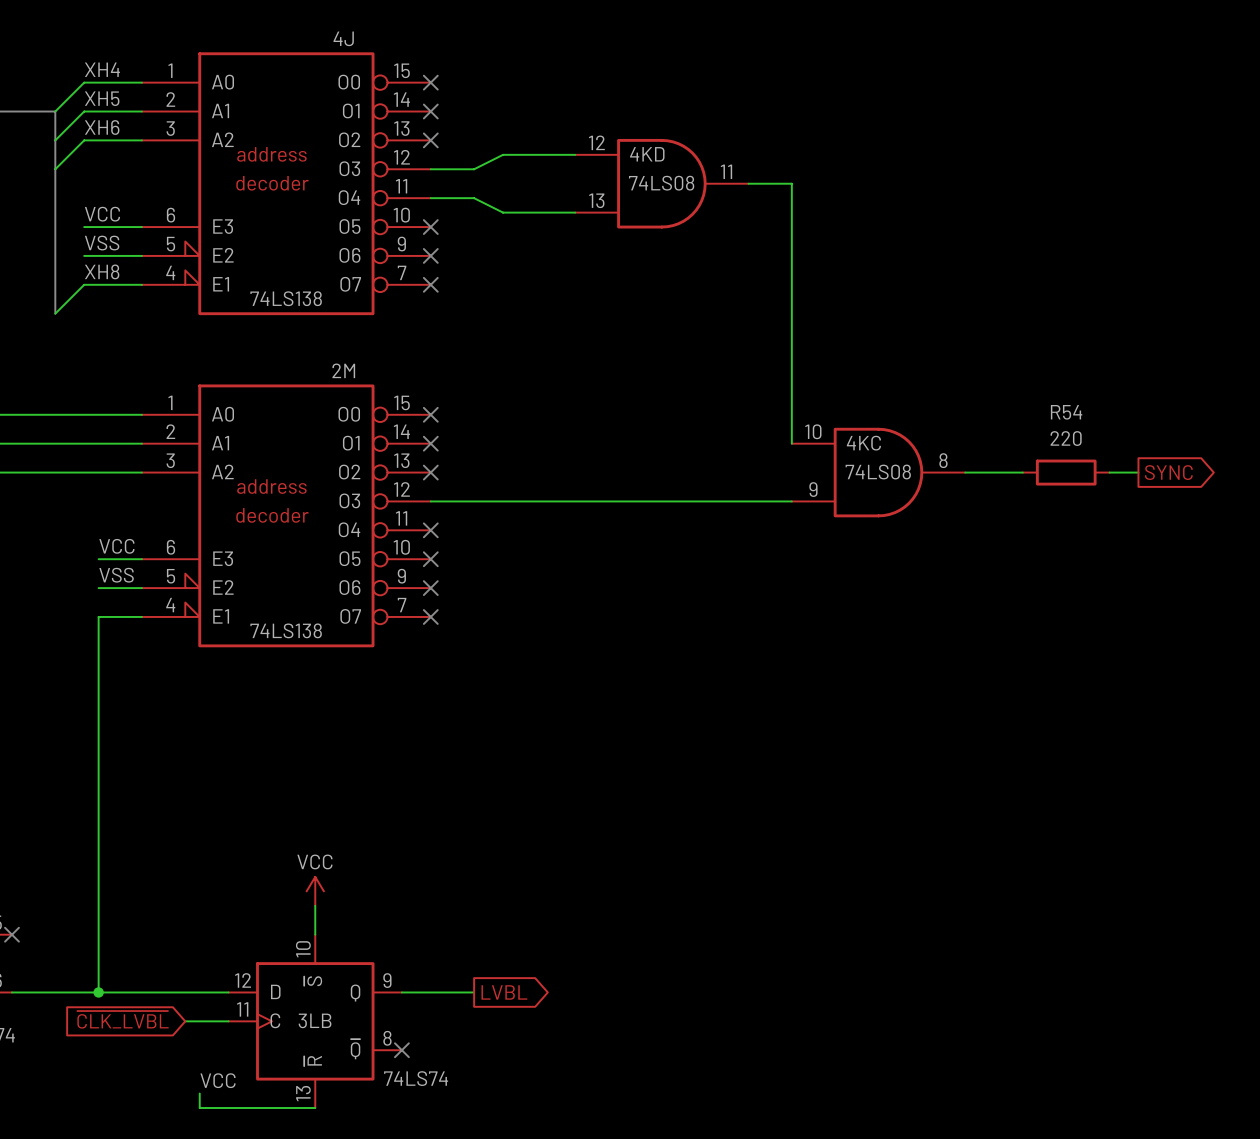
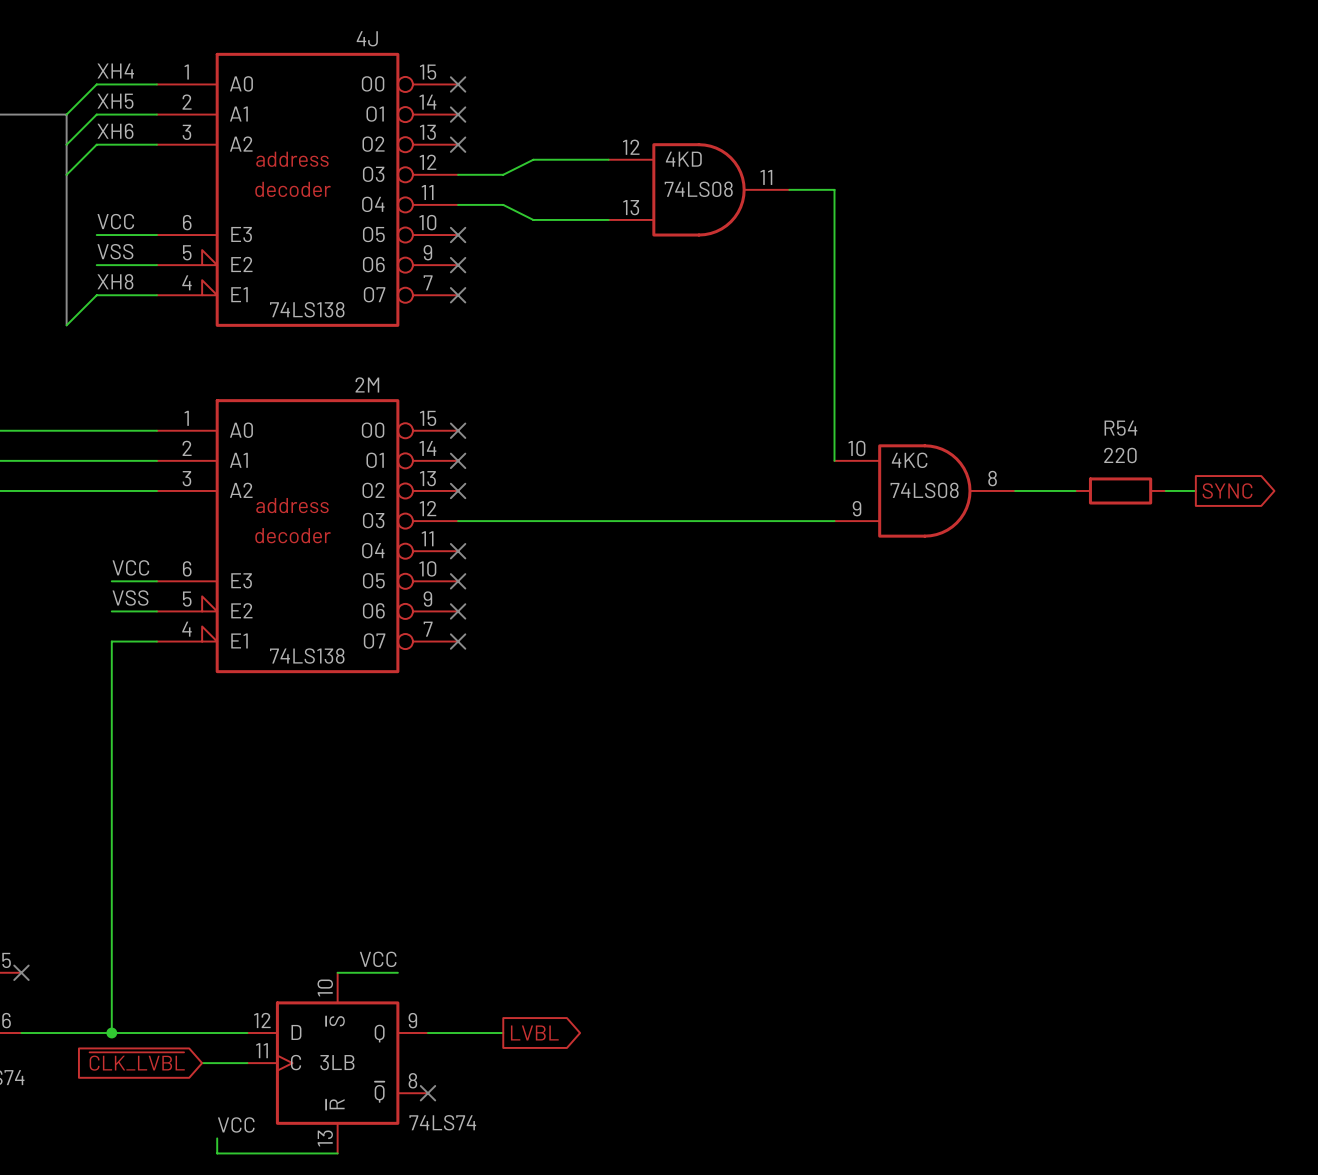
power symbol: VCC (315, 891) -> none
wire: (315, 905) (315, 934) -> (397, 972) (337, 972)
label: none -> VCC (378, 959)

